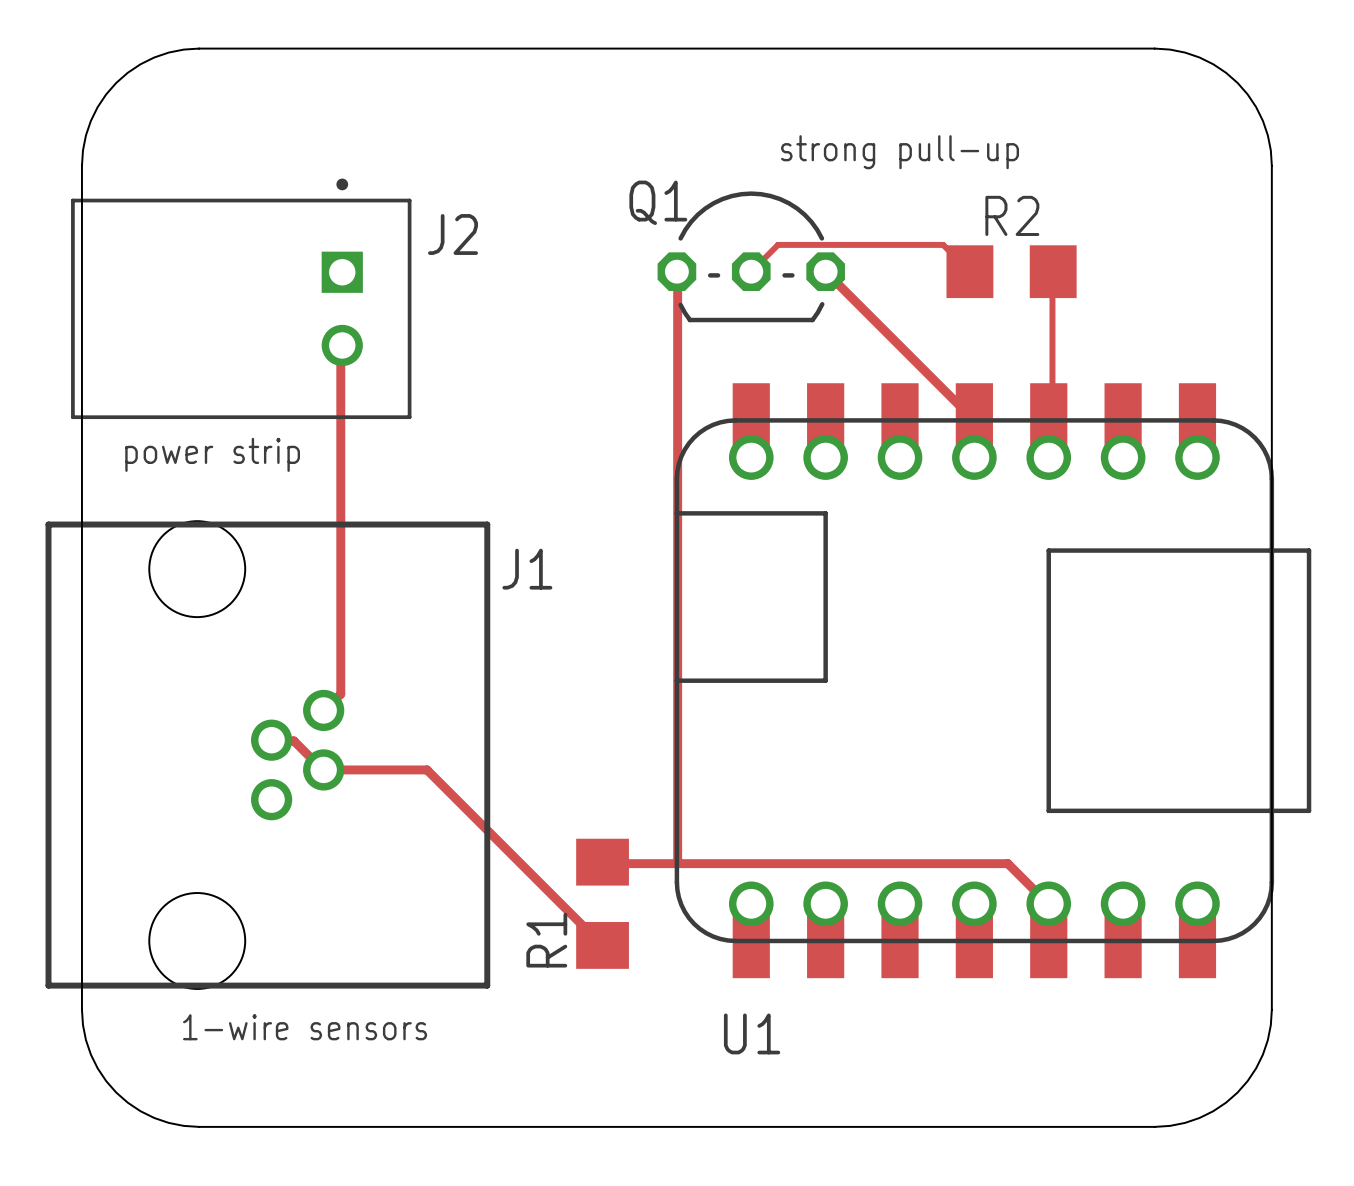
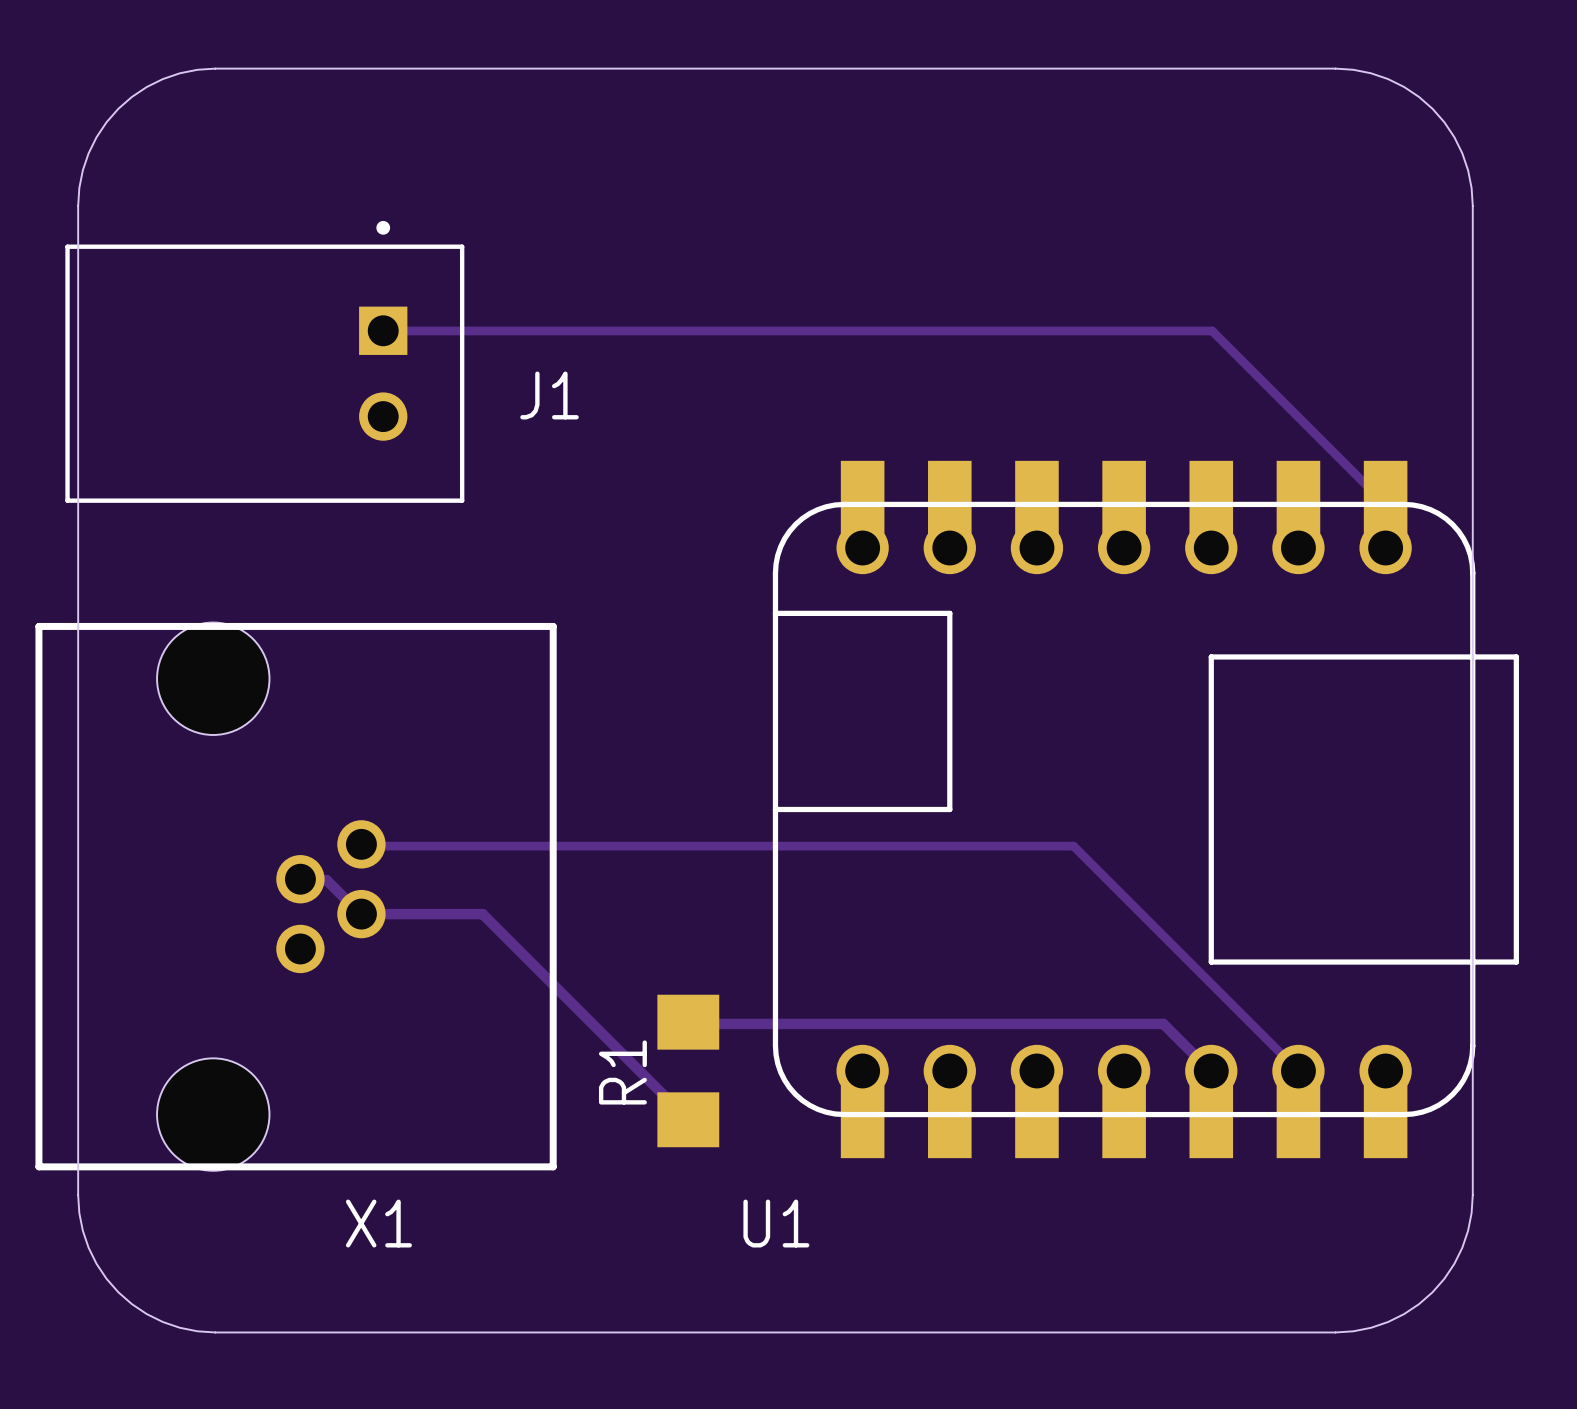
text: strong pull-up (900, 152) -> none
J2 name: J2 (453, 234) -> J1 (549, 395)
Q1: (751, 256) -> none
track: (676, 271) (677, 863) -> none
track: (751, 271) (778, 244) (943, 244) (969, 271) -> none
track: (825, 271) (974, 420) -> none
R2: (1011, 271) -> none
track: (1053, 271) (1052, 417) (1048, 420) (1048, 457) -> none
track: none -> (383, 330) (1212, 330) (1385, 504)
track: (342, 345) (340, 694) (323, 710) -> (1299, 1070) (1073, 846) (363, 846) (361, 844)
text: power strip (212, 454) -> none
J1 name: J1 (527, 569) -> X1 (378, 1223)
R1 name position: R1 (546, 940) -> R1 (622, 1072)
text: 1-wire sensors (305, 1027) -> none
U1 name position: U1 (752, 1033) -> U1 (776, 1223)

